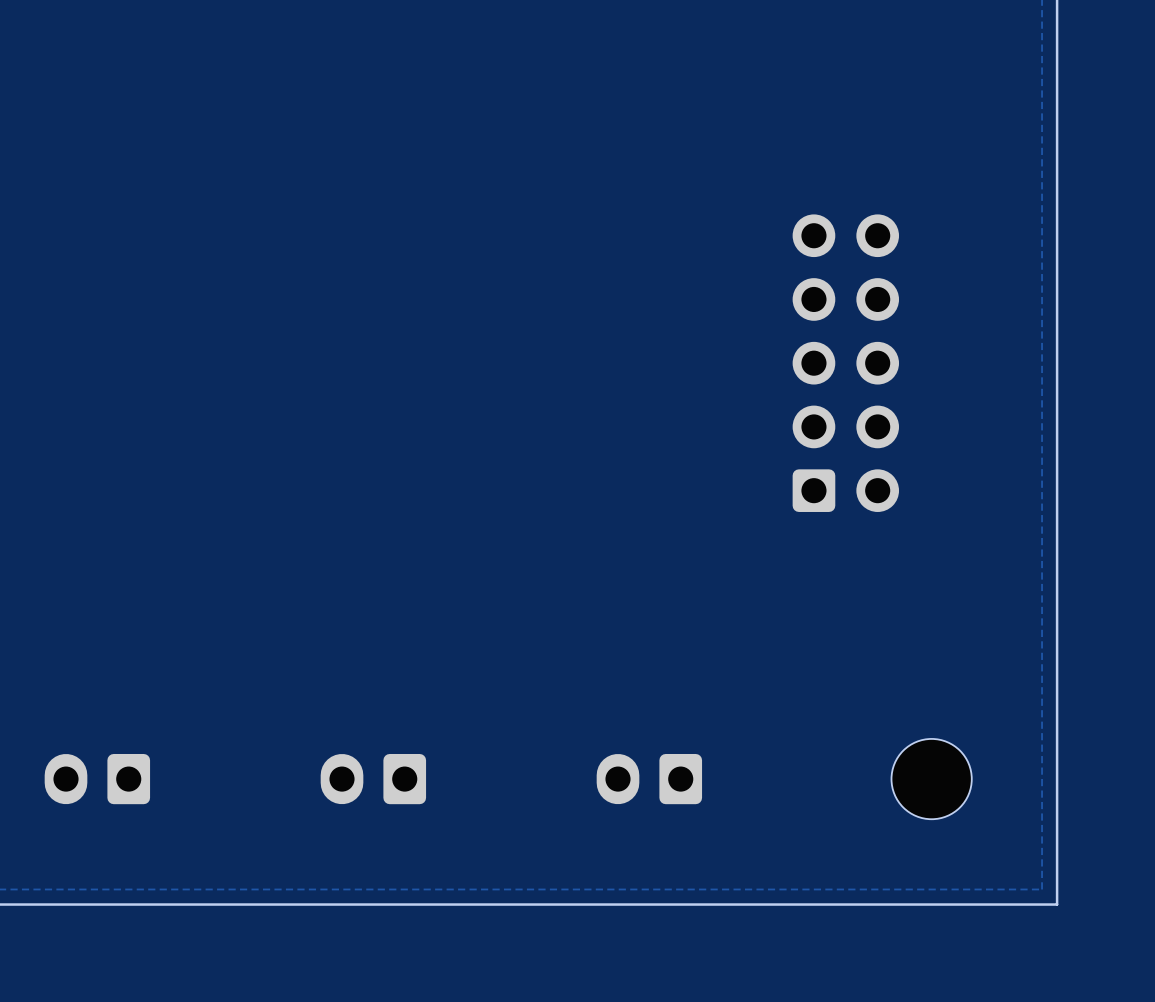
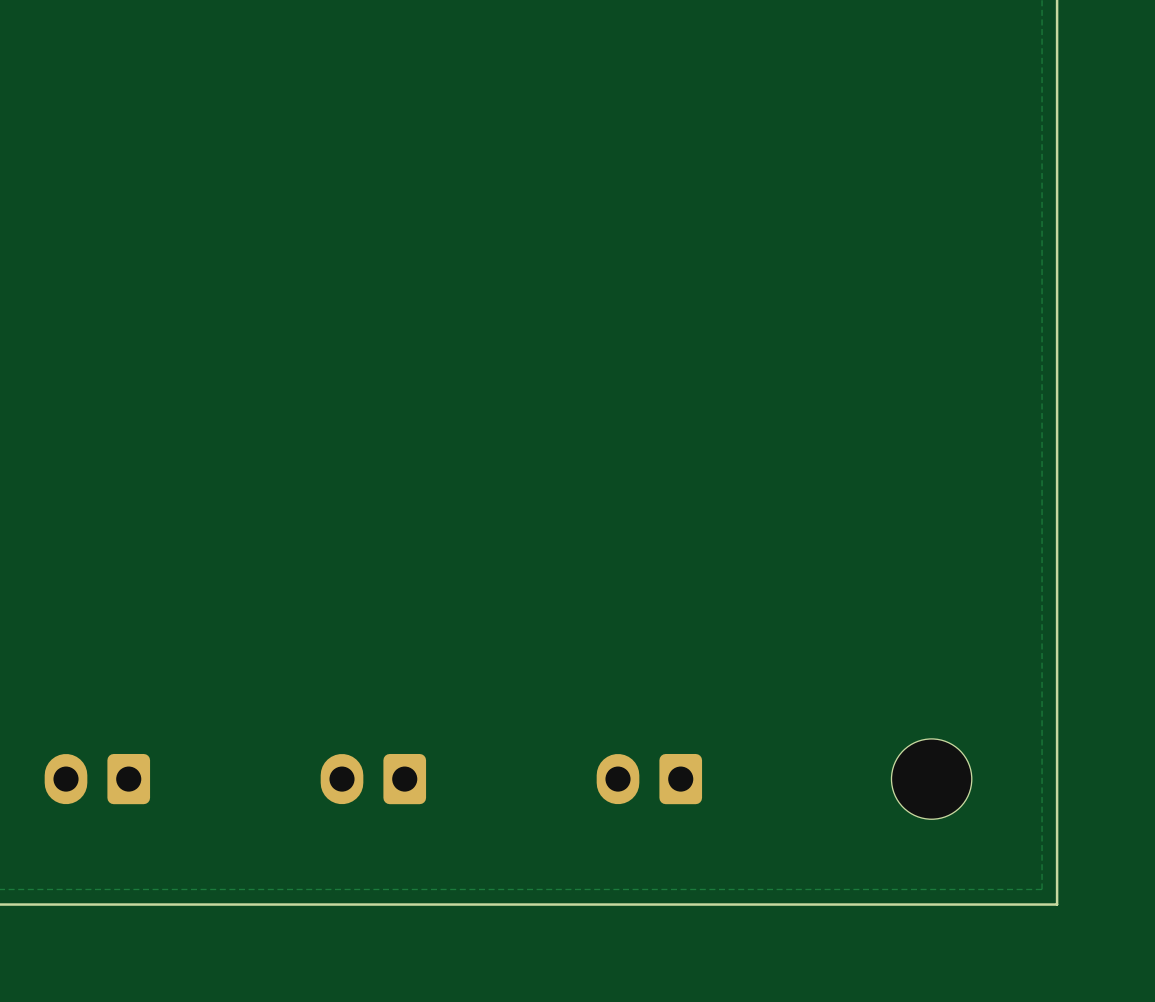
part: (845, 363) -> none

